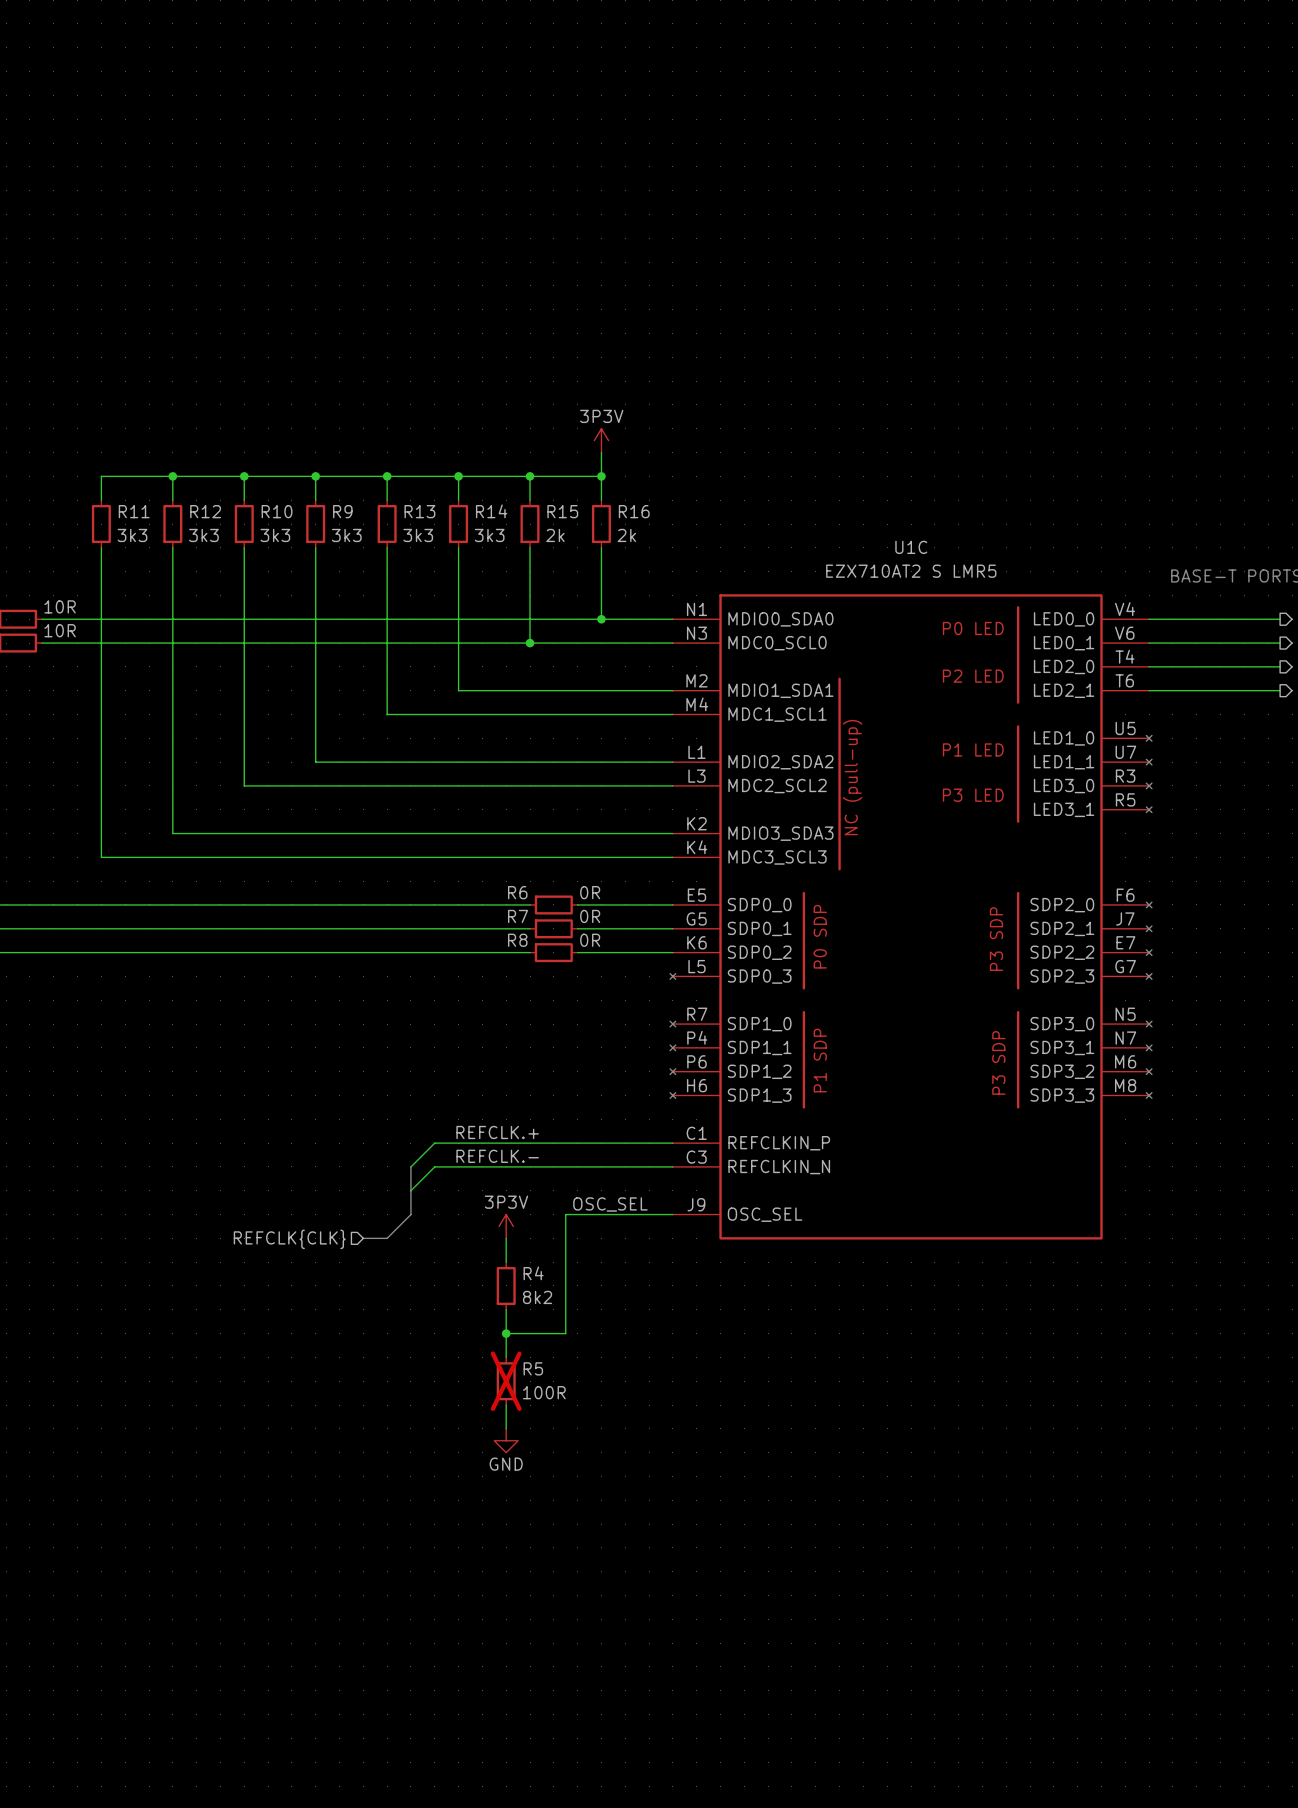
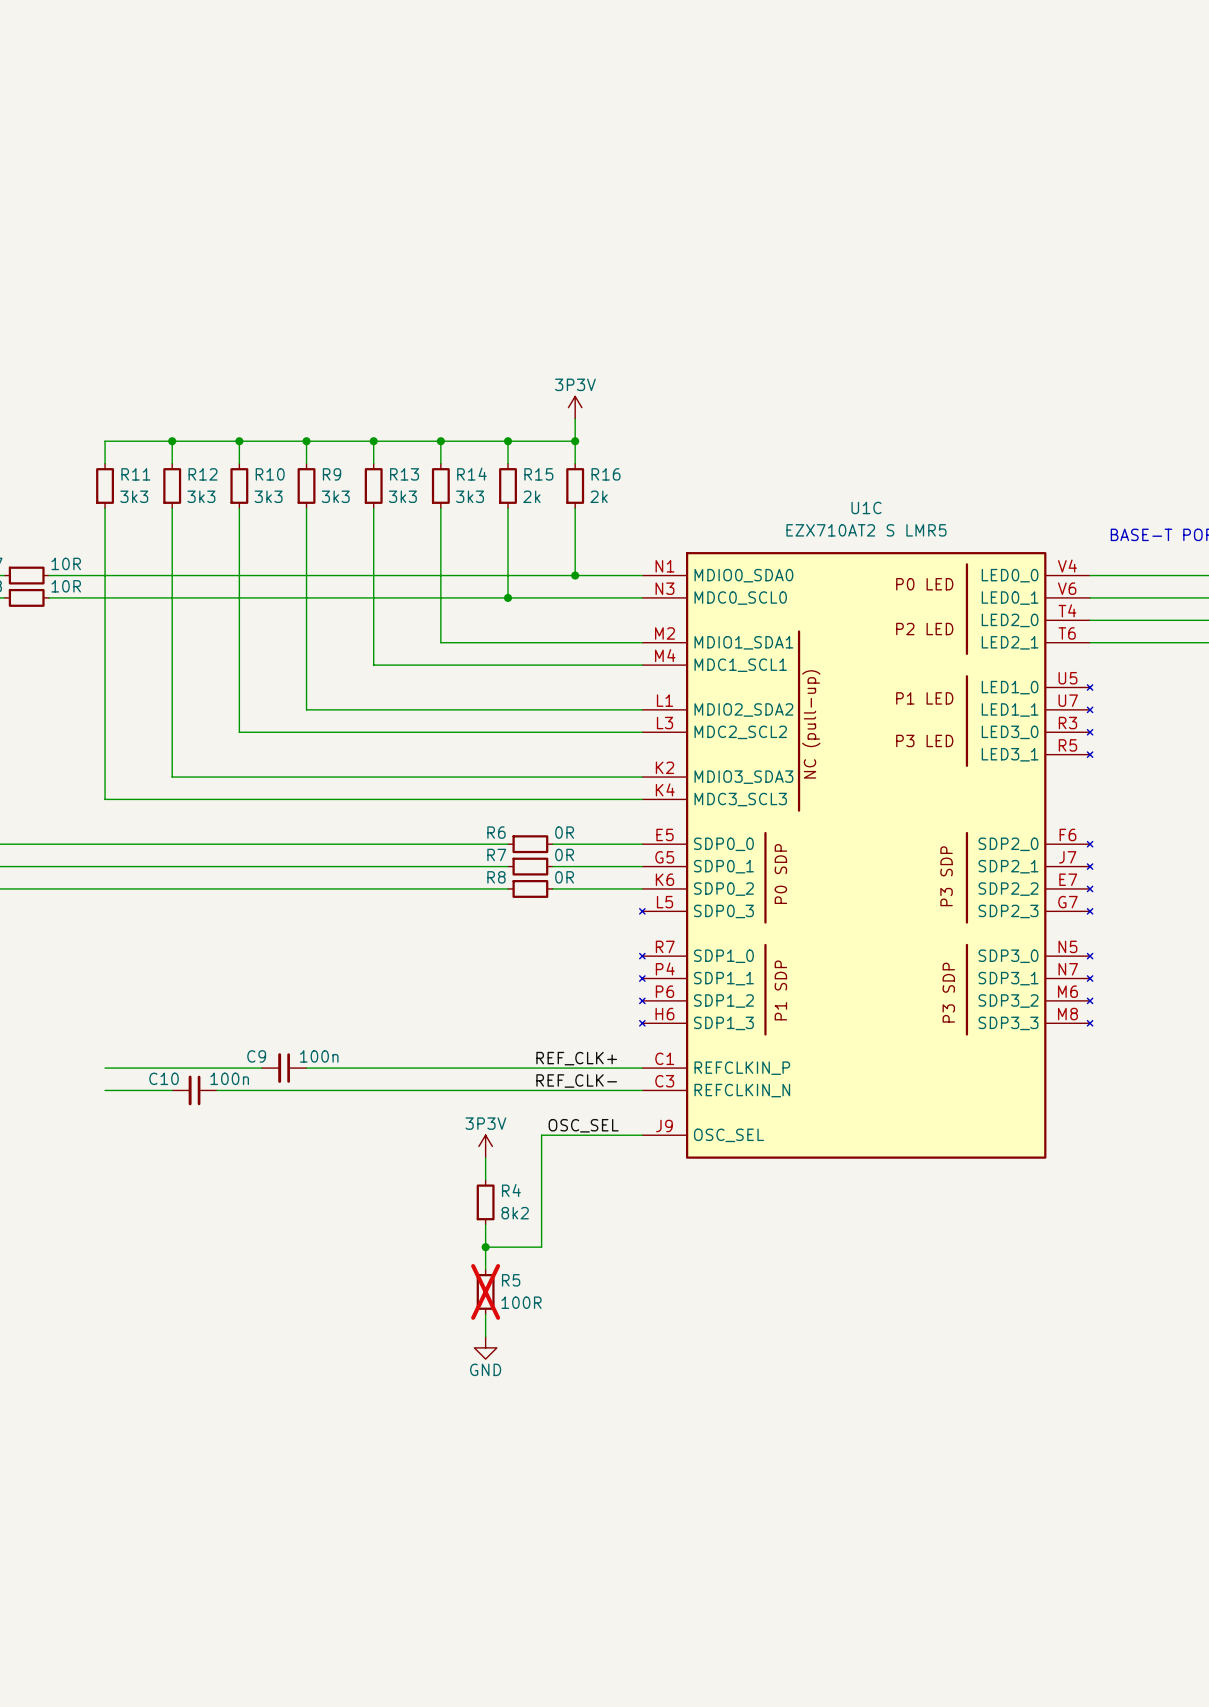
label: REFCLK.+ (497, 1132) -> none
label: none -> REF_CLK+ (576, 1058)
wire: none -> (105, 1068) (261, 1068)
C9: none -> (284, 1068)
wire: (434, 1143) (410, 1166) -> (418, 1068) (306, 1068)
label: REFCLK.- (497, 1156) -> none
label: none -> REF_CLK- (576, 1080)
wire: none -> (105, 1090) (172, 1090)
C10: none -> (194, 1090)
bus: (410, 1166) (410, 1214) (387, 1238) (363, 1238) -> none
wire: (434, 1166) (410, 1190) -> (418, 1090) (216, 1090)
hierarchical label: REFCLK{CLK} (289, 1239) -> none

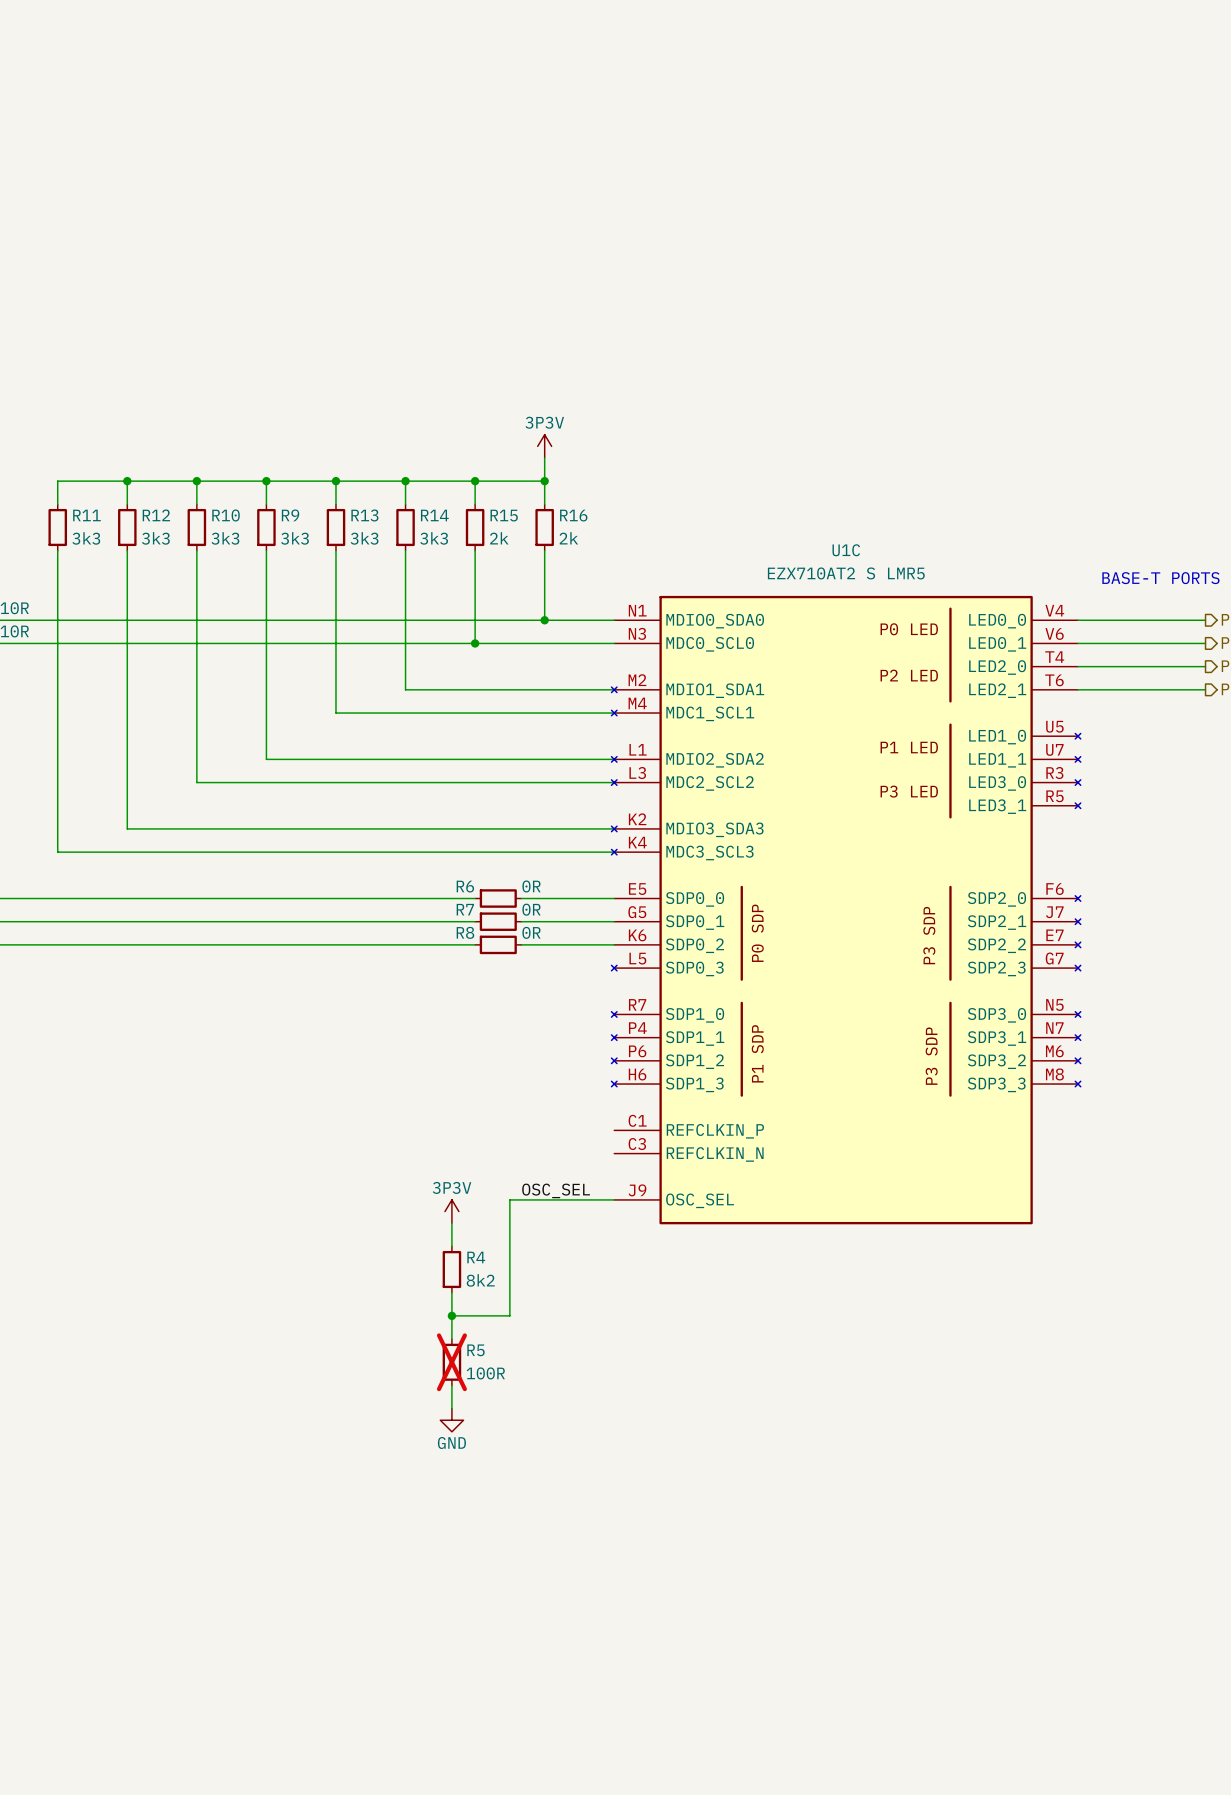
U1C symbol: [639, 552, 1093, 1159] -> [611, 595, 1081, 1225]
label: REF_CLK+ (576, 1058) -> none
wire: (105, 1068) (261, 1068) -> none
C9: (284, 1068) -> none
wire: (306, 1068) (642, 1068) -> none
label: REF_CLK- (576, 1080) -> none
wire: (105, 1090) (172, 1090) -> none
C10: (194, 1090) -> none
wire: (216, 1090) (642, 1090) -> none

